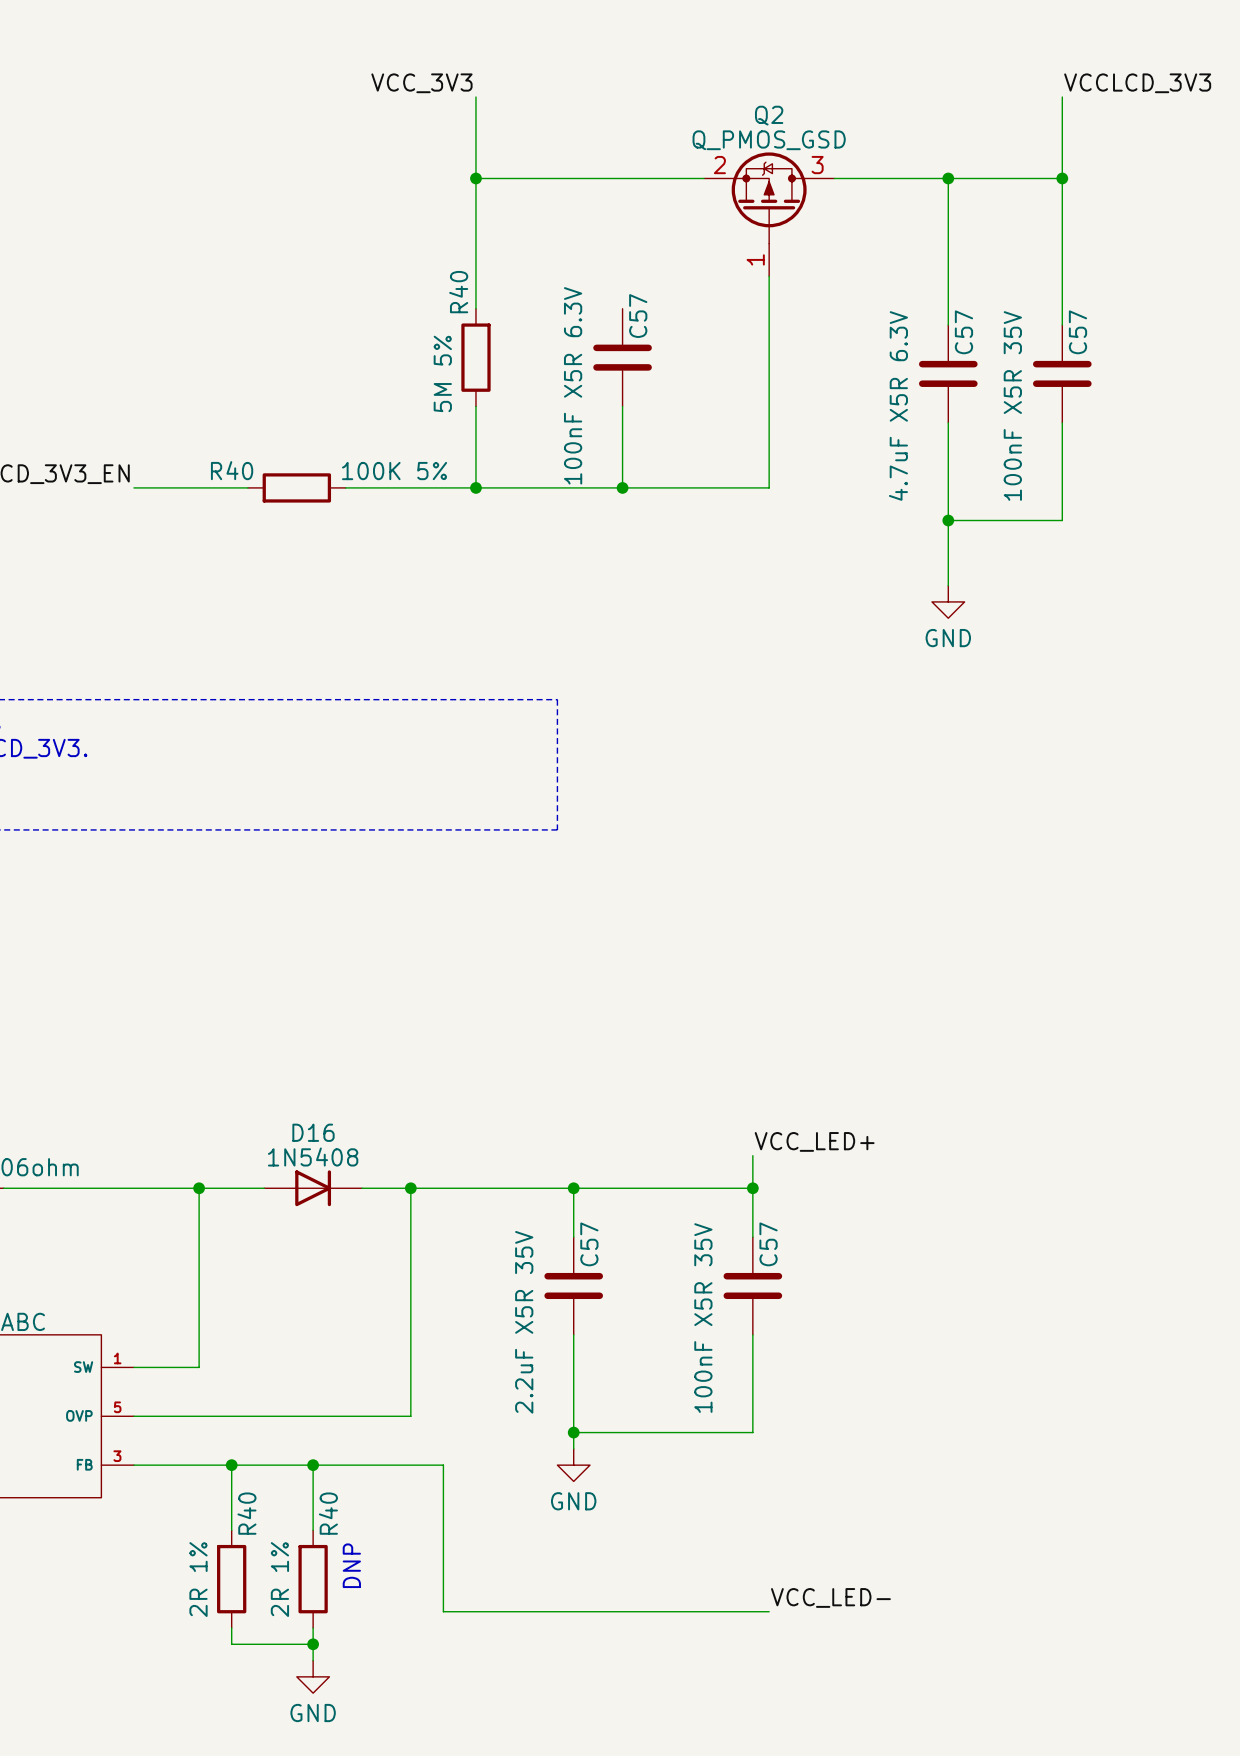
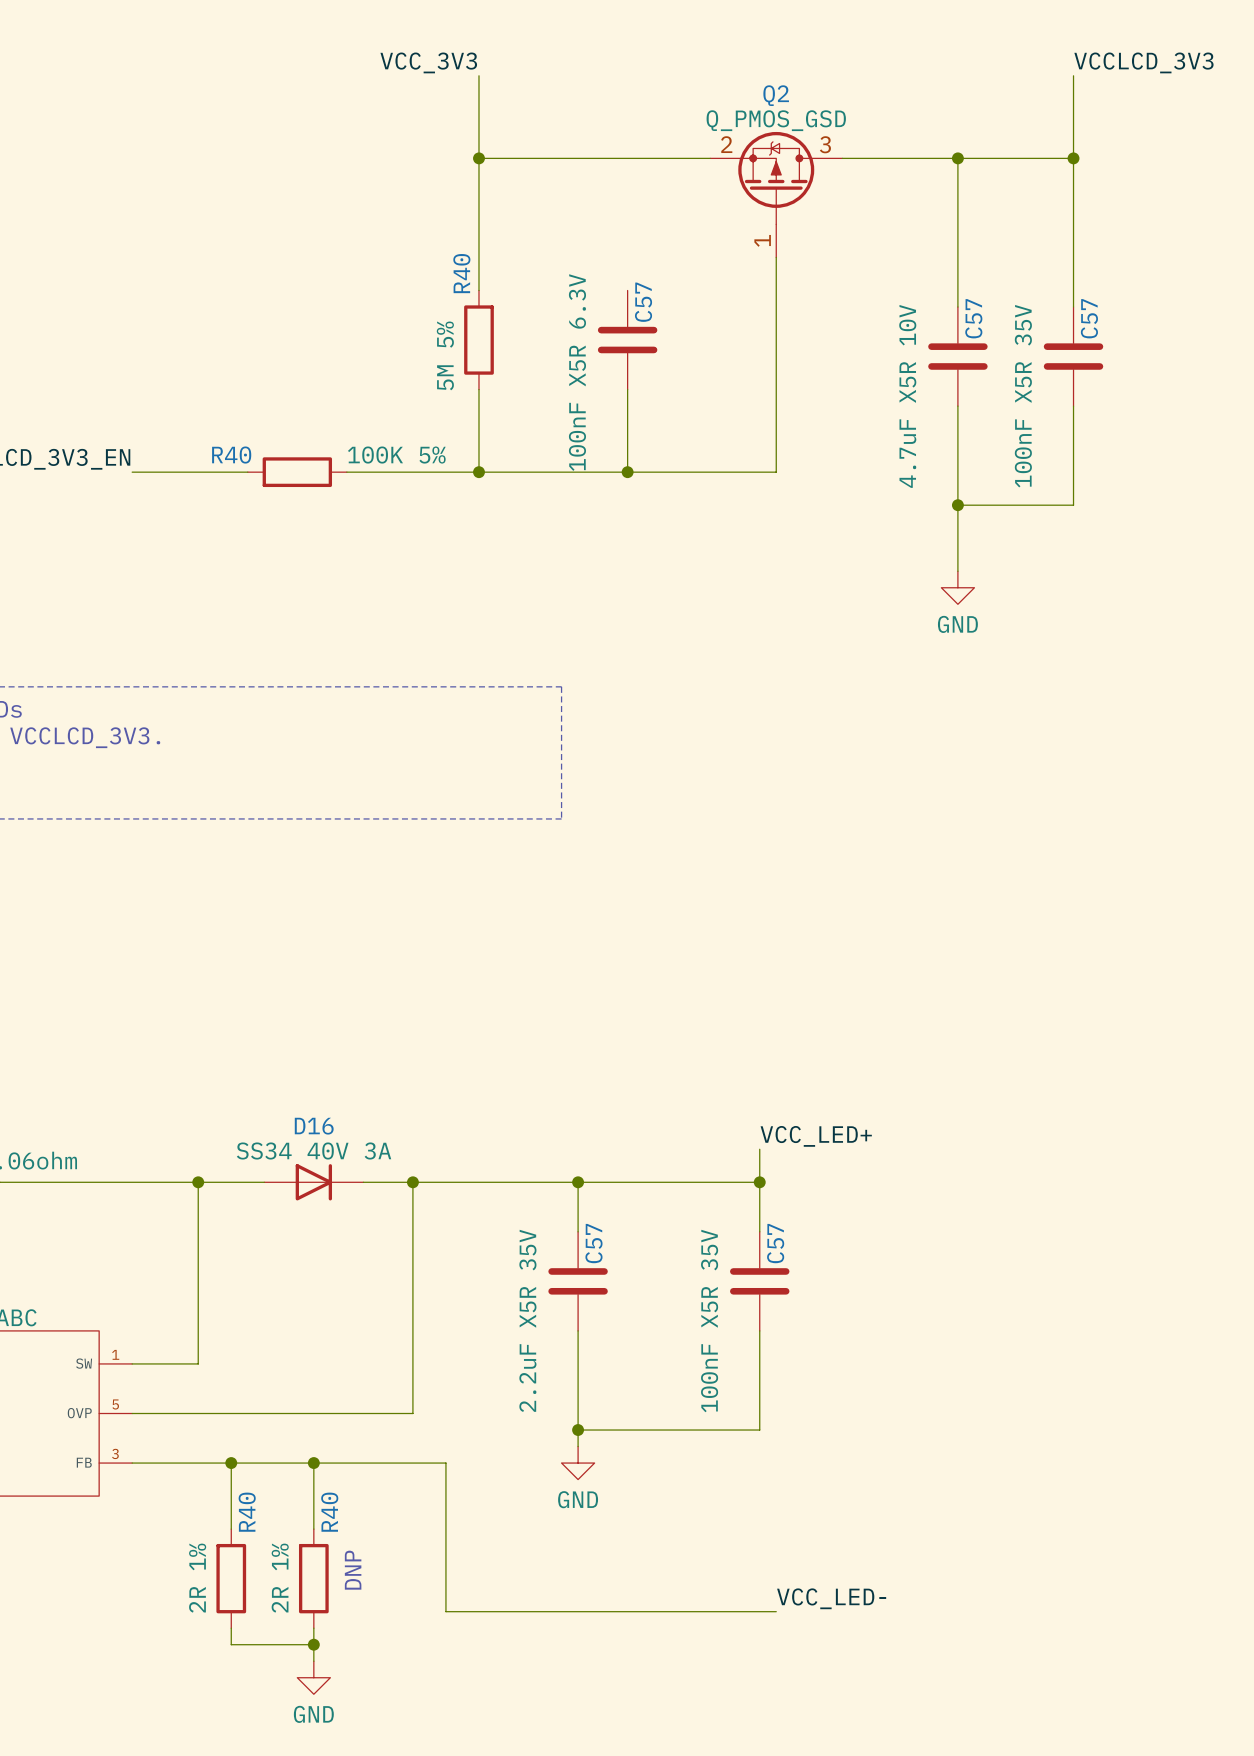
C57 value: 4.7uF X5R 6.3V (898, 405) -> 4.7uF X5R 10V (907, 396)
D16 value: 1N5408 (313, 1157) -> SS34 40V 3A (314, 1151)

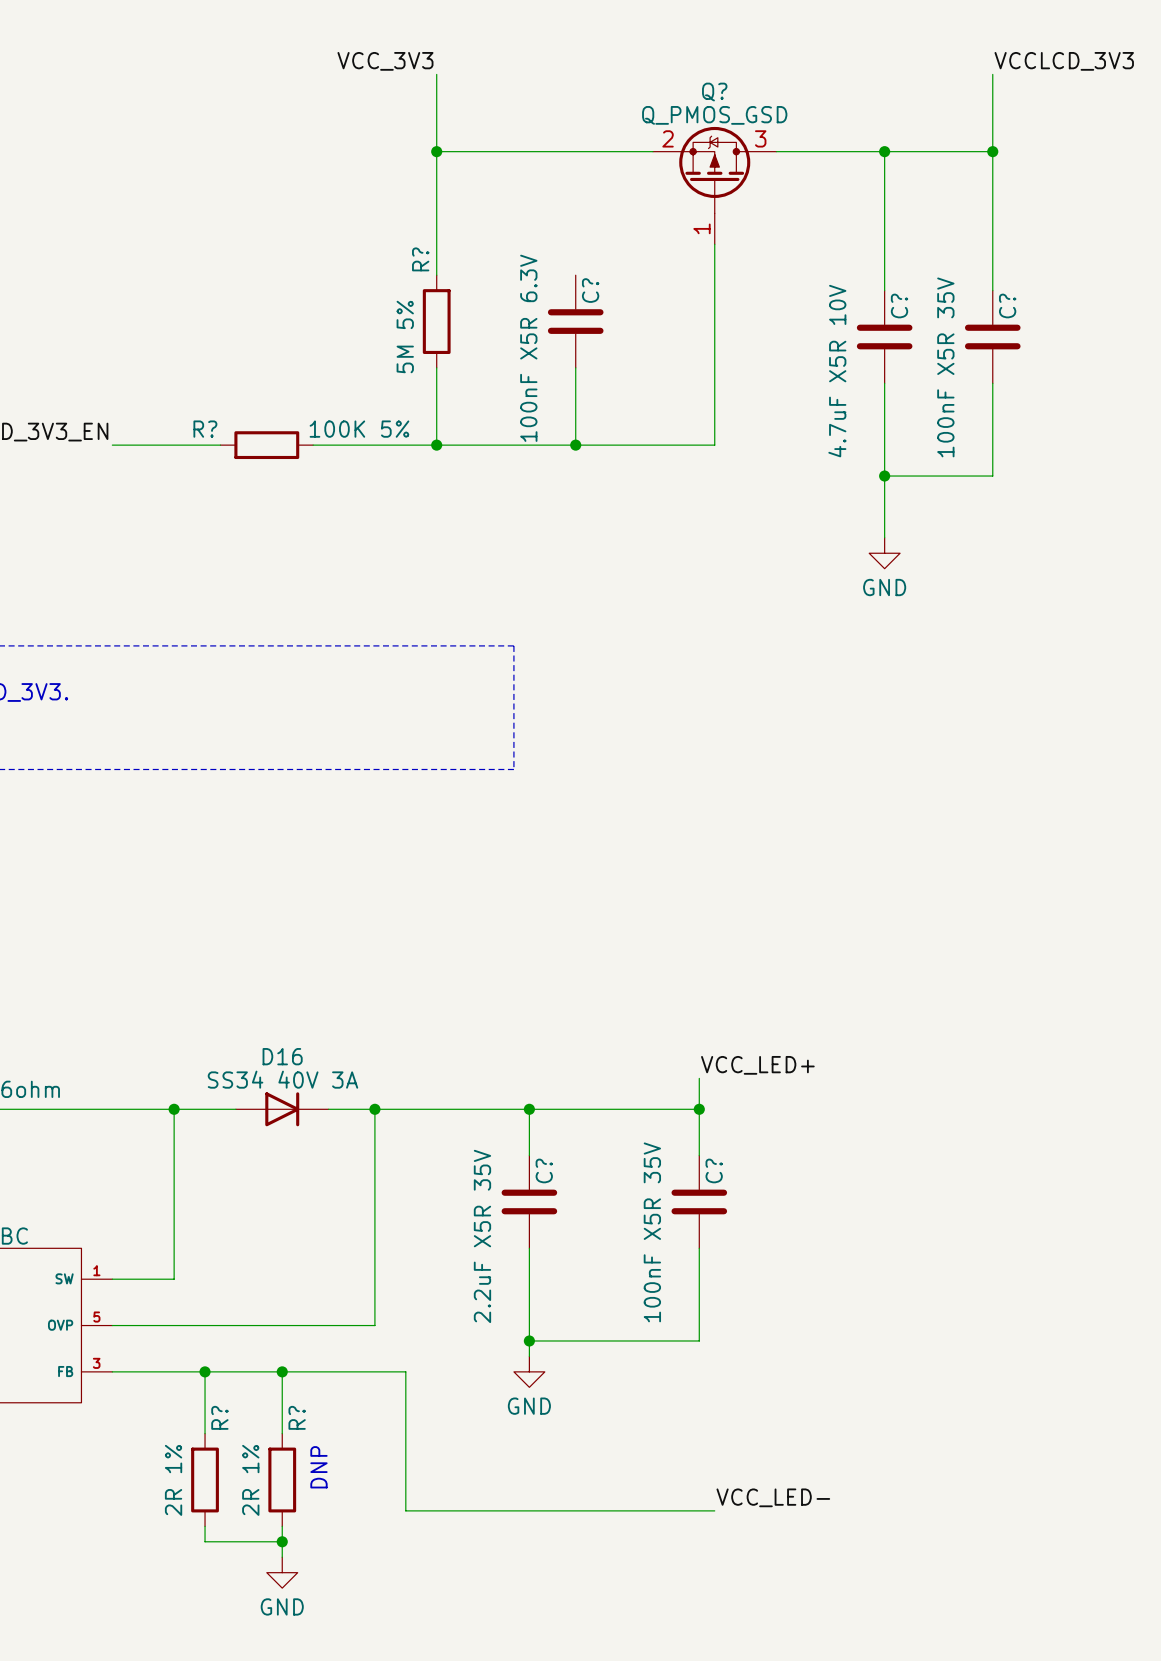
Q2 name: Q2 (776, 95) -> Q? (714, 92)
R40 name: R40 (461, 273) -> R? (420, 259)
C57 name: C57 (643, 302) -> C? (590, 290)
C57 name: C57 (973, 318) -> C? (899, 305)
C57 name: C57 (1089, 318) -> C? (1007, 305)
R40 name: R40 (231, 455) -> R? (205, 429)
C57 name: C57 (593, 1243) -> C? (544, 1170)
C57 name: C57 (775, 1243) -> C? (714, 1170)
R40 name: R40 (247, 1512) -> R? (219, 1417)
R40 name: R40 (329, 1512) -> R? (297, 1417)

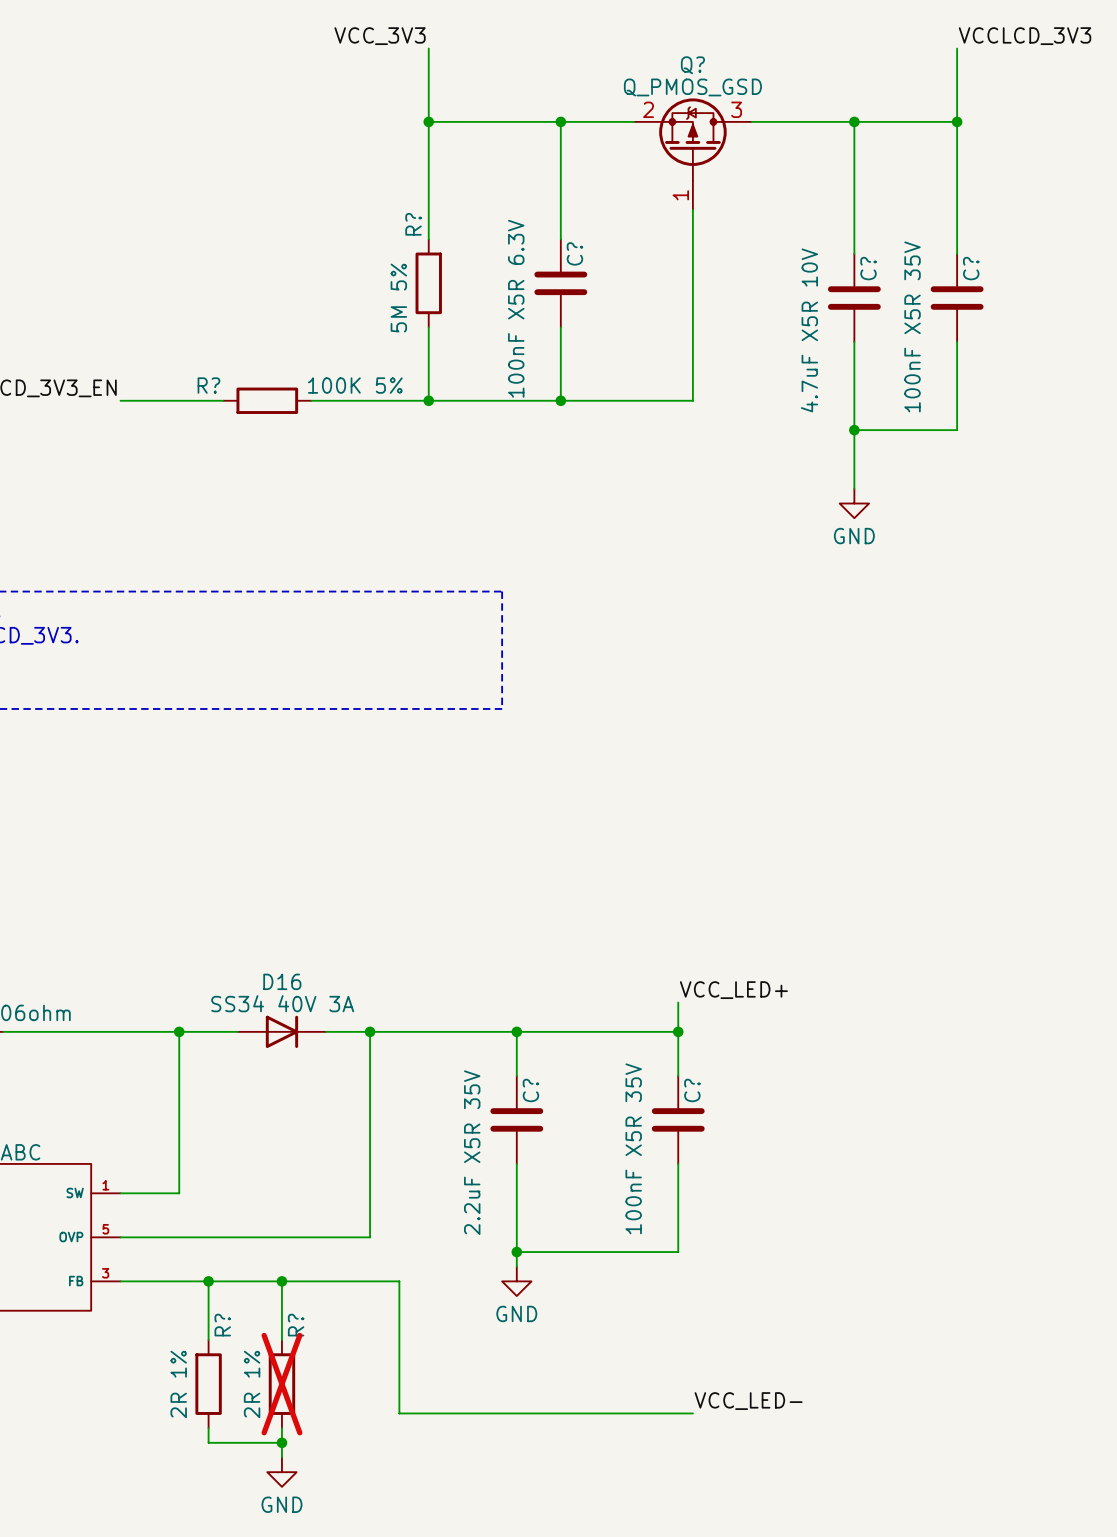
wire: none -> (560, 121) (560, 239)
junction: none -> (560, 121)
text: DNP (318, 1467) -> none
R? do-not-place cross: none -> (281, 1384)

